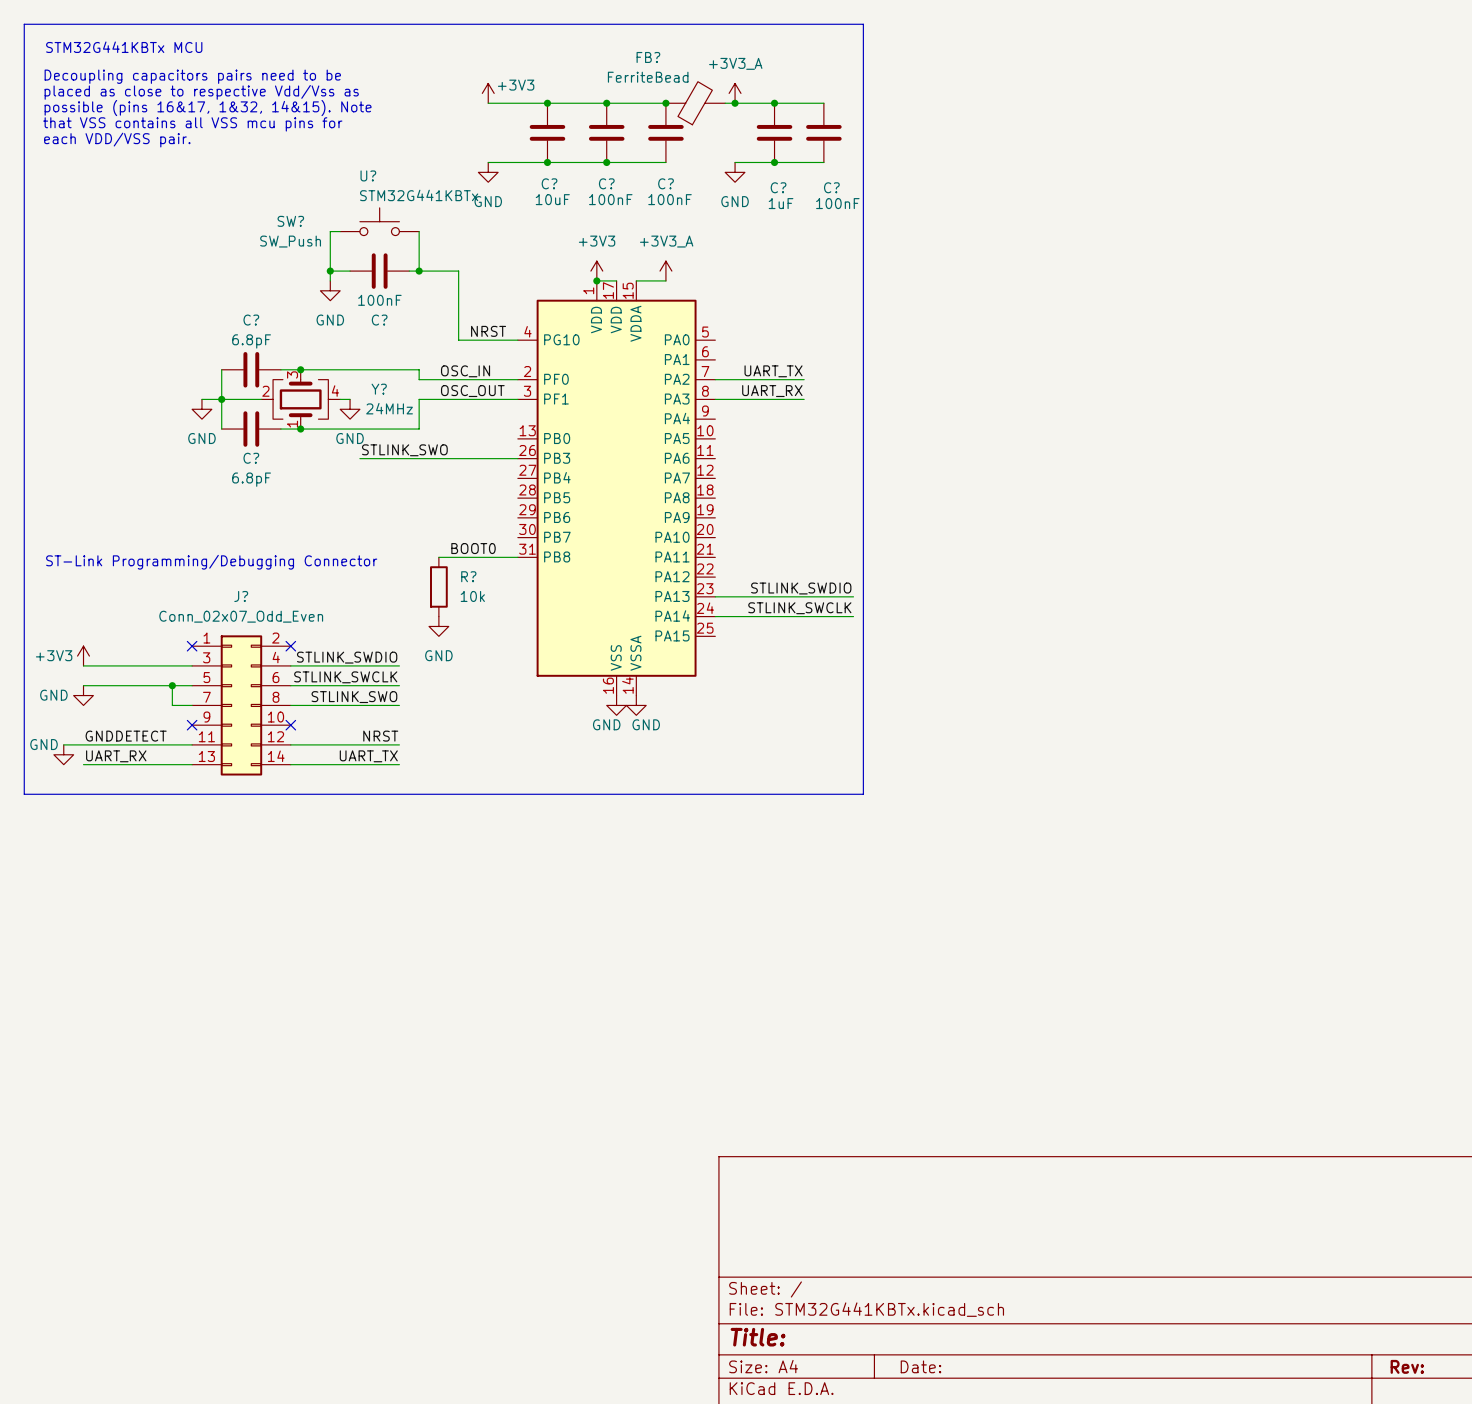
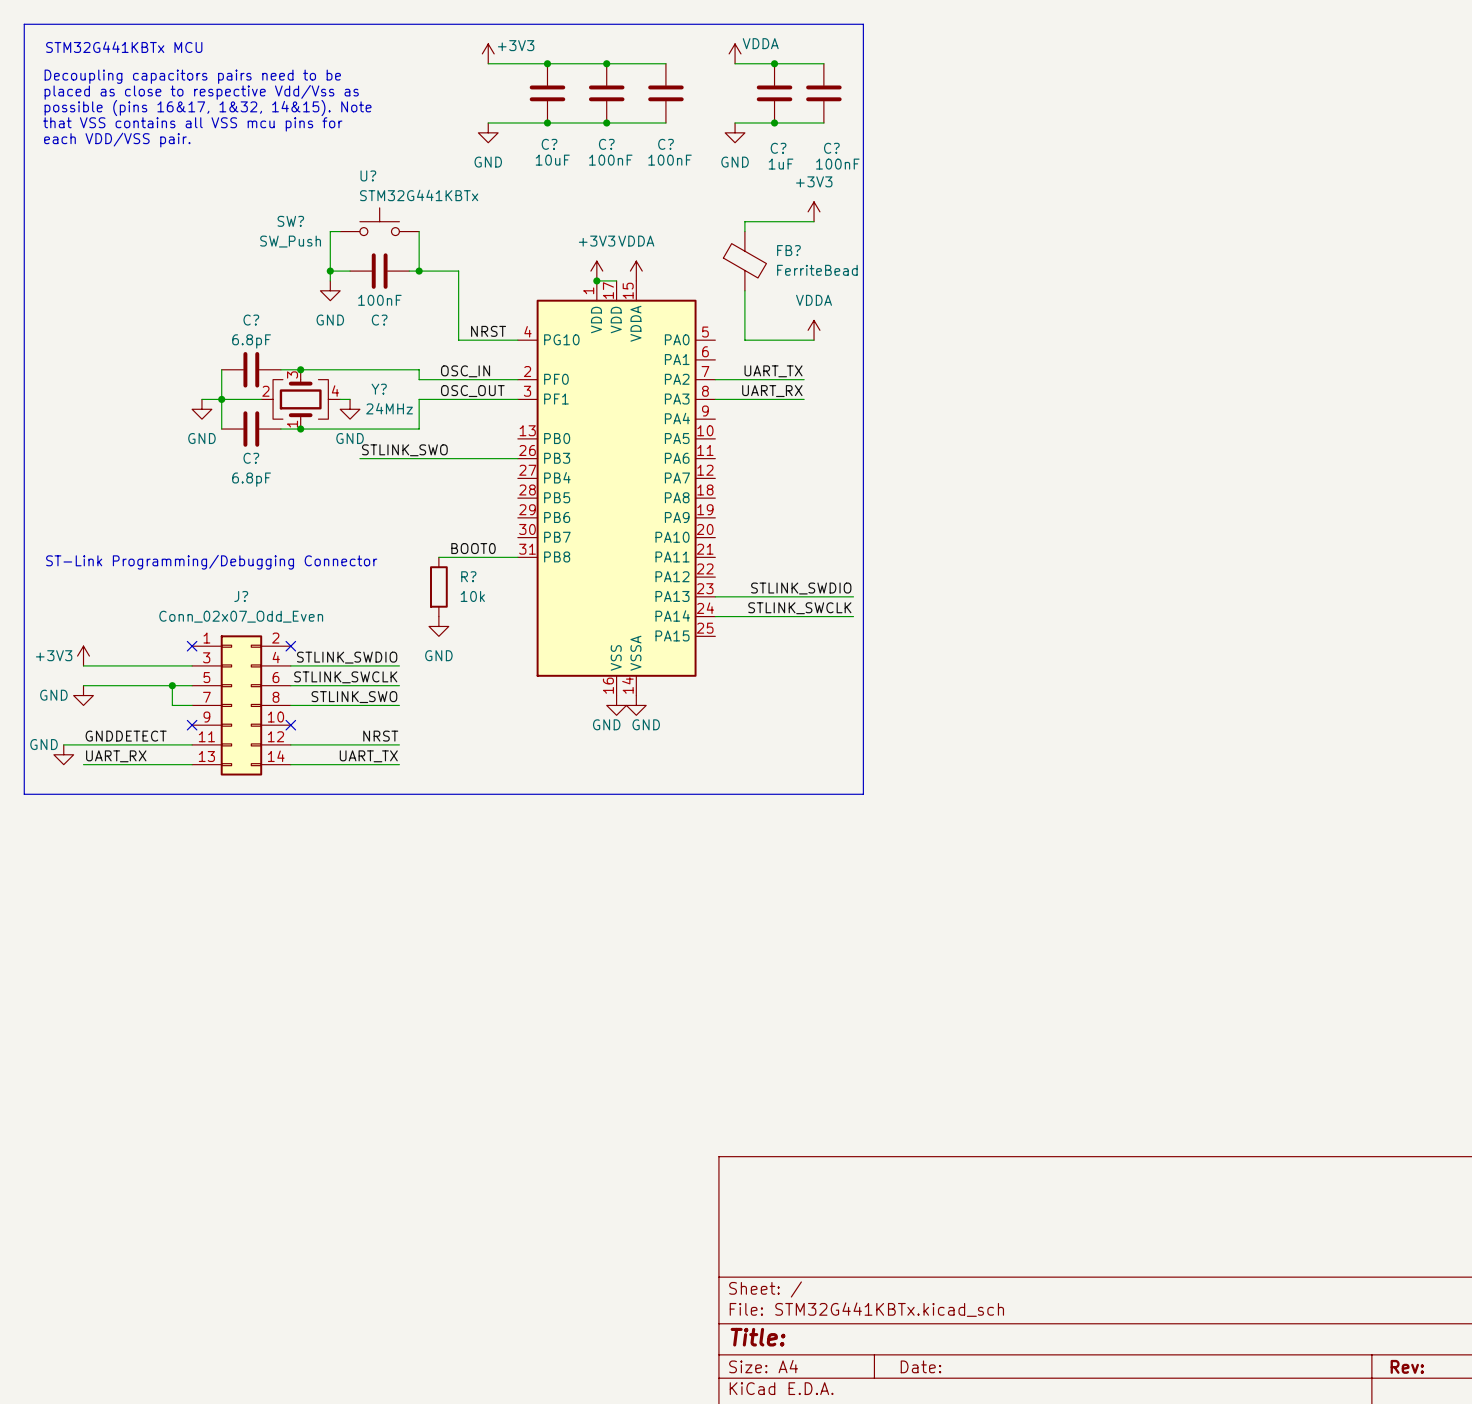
power symbol: none -> VDDA (735, 53)
FB? name position: FB? (648, 57) -> FB? (788, 250)
junction: none -> (547, 63)
junction: none -> (606, 63)
wire: none -> (735, 63) (823, 63)
junction: none -> (774, 63)
FB? value position: FerriteBead (648, 77) -> FerriteBead (817, 270)
power symbol position: +3V3 (488, 93) -> +3V3 (488, 53)
C?: none -> 100nF (606, 93)
C?: none -> 100nF (665, 93)
power symbol: +3V3_A (735, 93) -> none
wire: (488, 103) (665, 103) -> (488, 63) (665, 63)
junction: (547, 103) -> none
junction: (606, 103) -> none
junction: (665, 103) -> none
FB? rotation: 0° (695, 103) -> 90° clockwise (744, 260)
FB? position: (695, 103) -> (744, 261)
wire: (725, 103) (823, 103) -> none
junction: (735, 103) -> none
junction: (774, 103) -> none
junction: none -> (547, 122)
junction: none -> (606, 122)
junction: none -> (774, 122)
C? position: (547, 132) -> (547, 93)
C?: 100nF (606, 132) -> none
C?: 100nF (665, 132) -> none
C? position: (774, 132) -> (774, 93)
C? position: (823, 132) -> (823, 93)
wire: (488, 162) (665, 162) -> (488, 122) (665, 122)
junction: (547, 162) -> none
junction: (606, 162) -> none
wire: (735, 162) (823, 162) -> (735, 122) (823, 122)
junction: (774, 162) -> none
power symbol position: GND (488, 172) -> GND (488, 132)
power symbol position: GND (735, 172) -> GND (735, 132)
power symbol: none -> +3V3 (814, 211)
wire: none -> (814, 221) (744, 221) (744, 231)
power symbol: none -> VDDA (636, 271)
power symbol: +3V3_A (665, 271) -> none
wire: (636, 280) (665, 280) -> none
wire: none -> (744, 290) (744, 340) (814, 340)
power symbol: none -> VDDA (814, 330)

